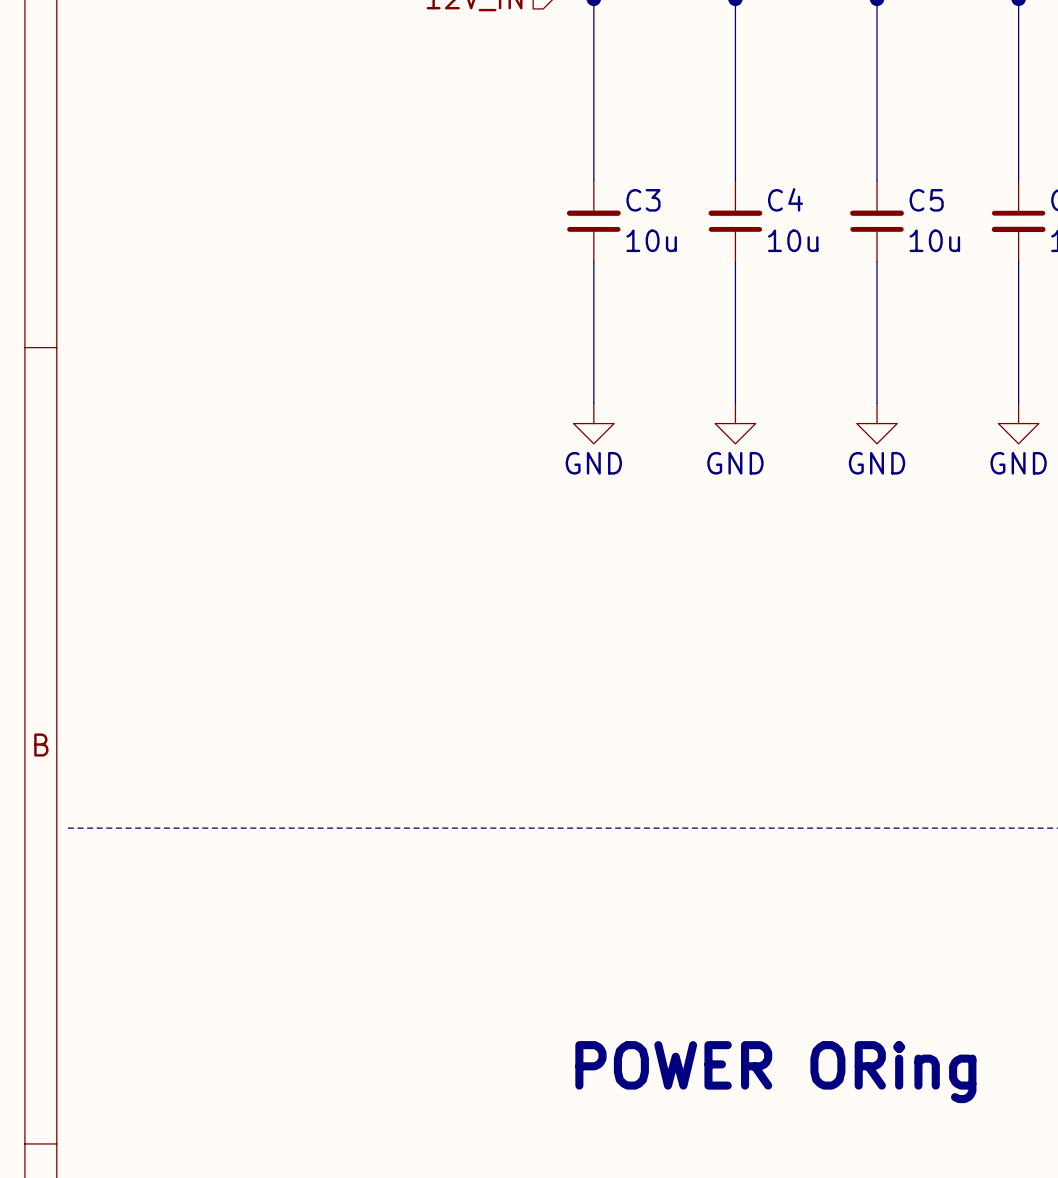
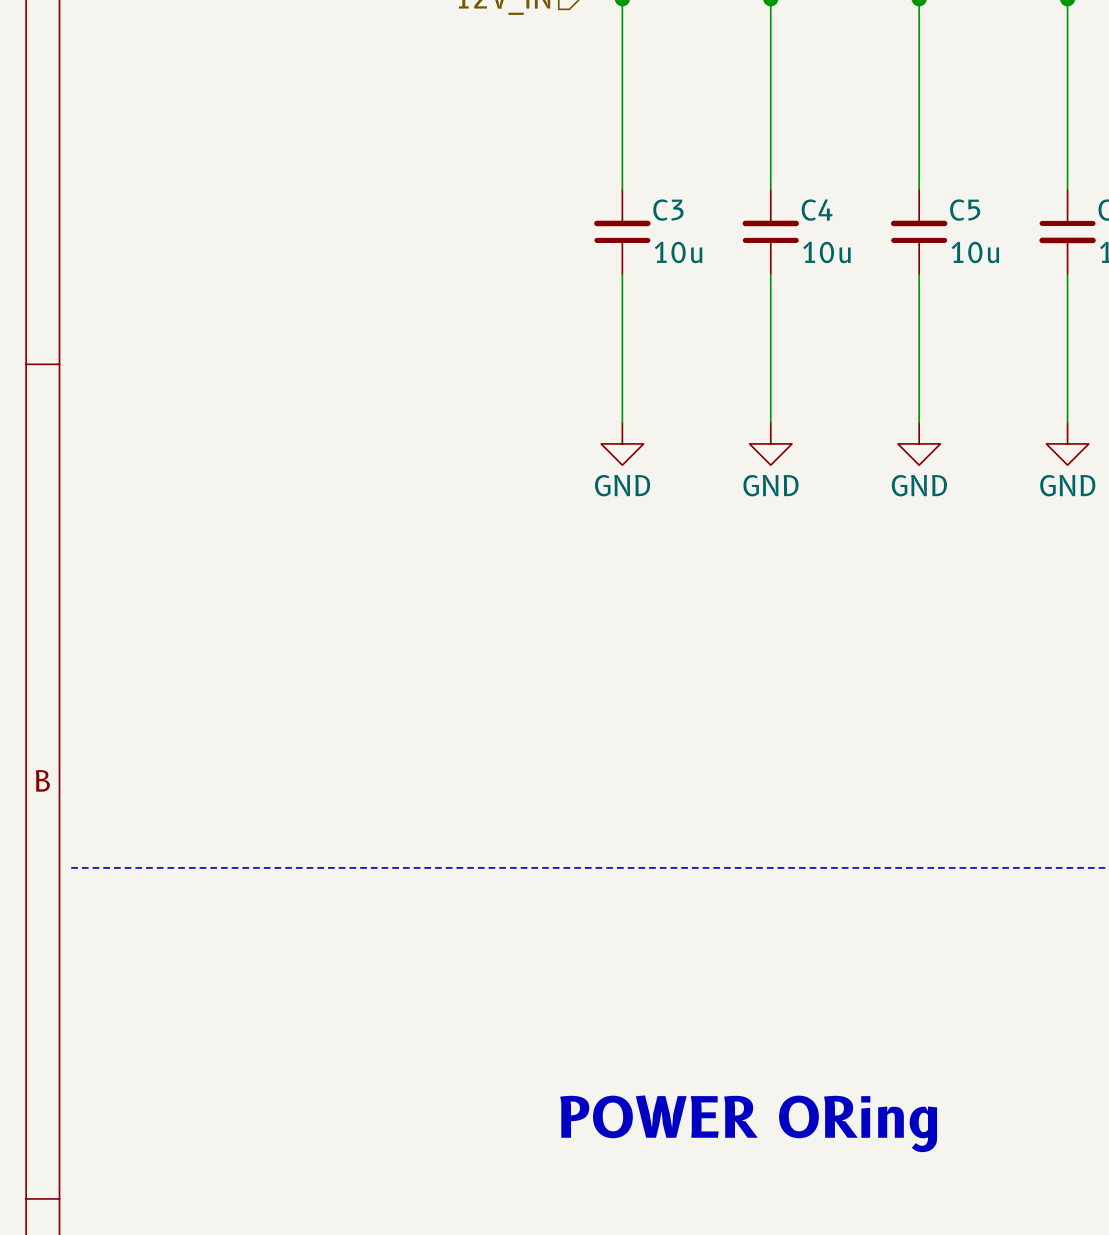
text position: POWER ORing (775, 1072) -> POWER ORing (748, 1123)

